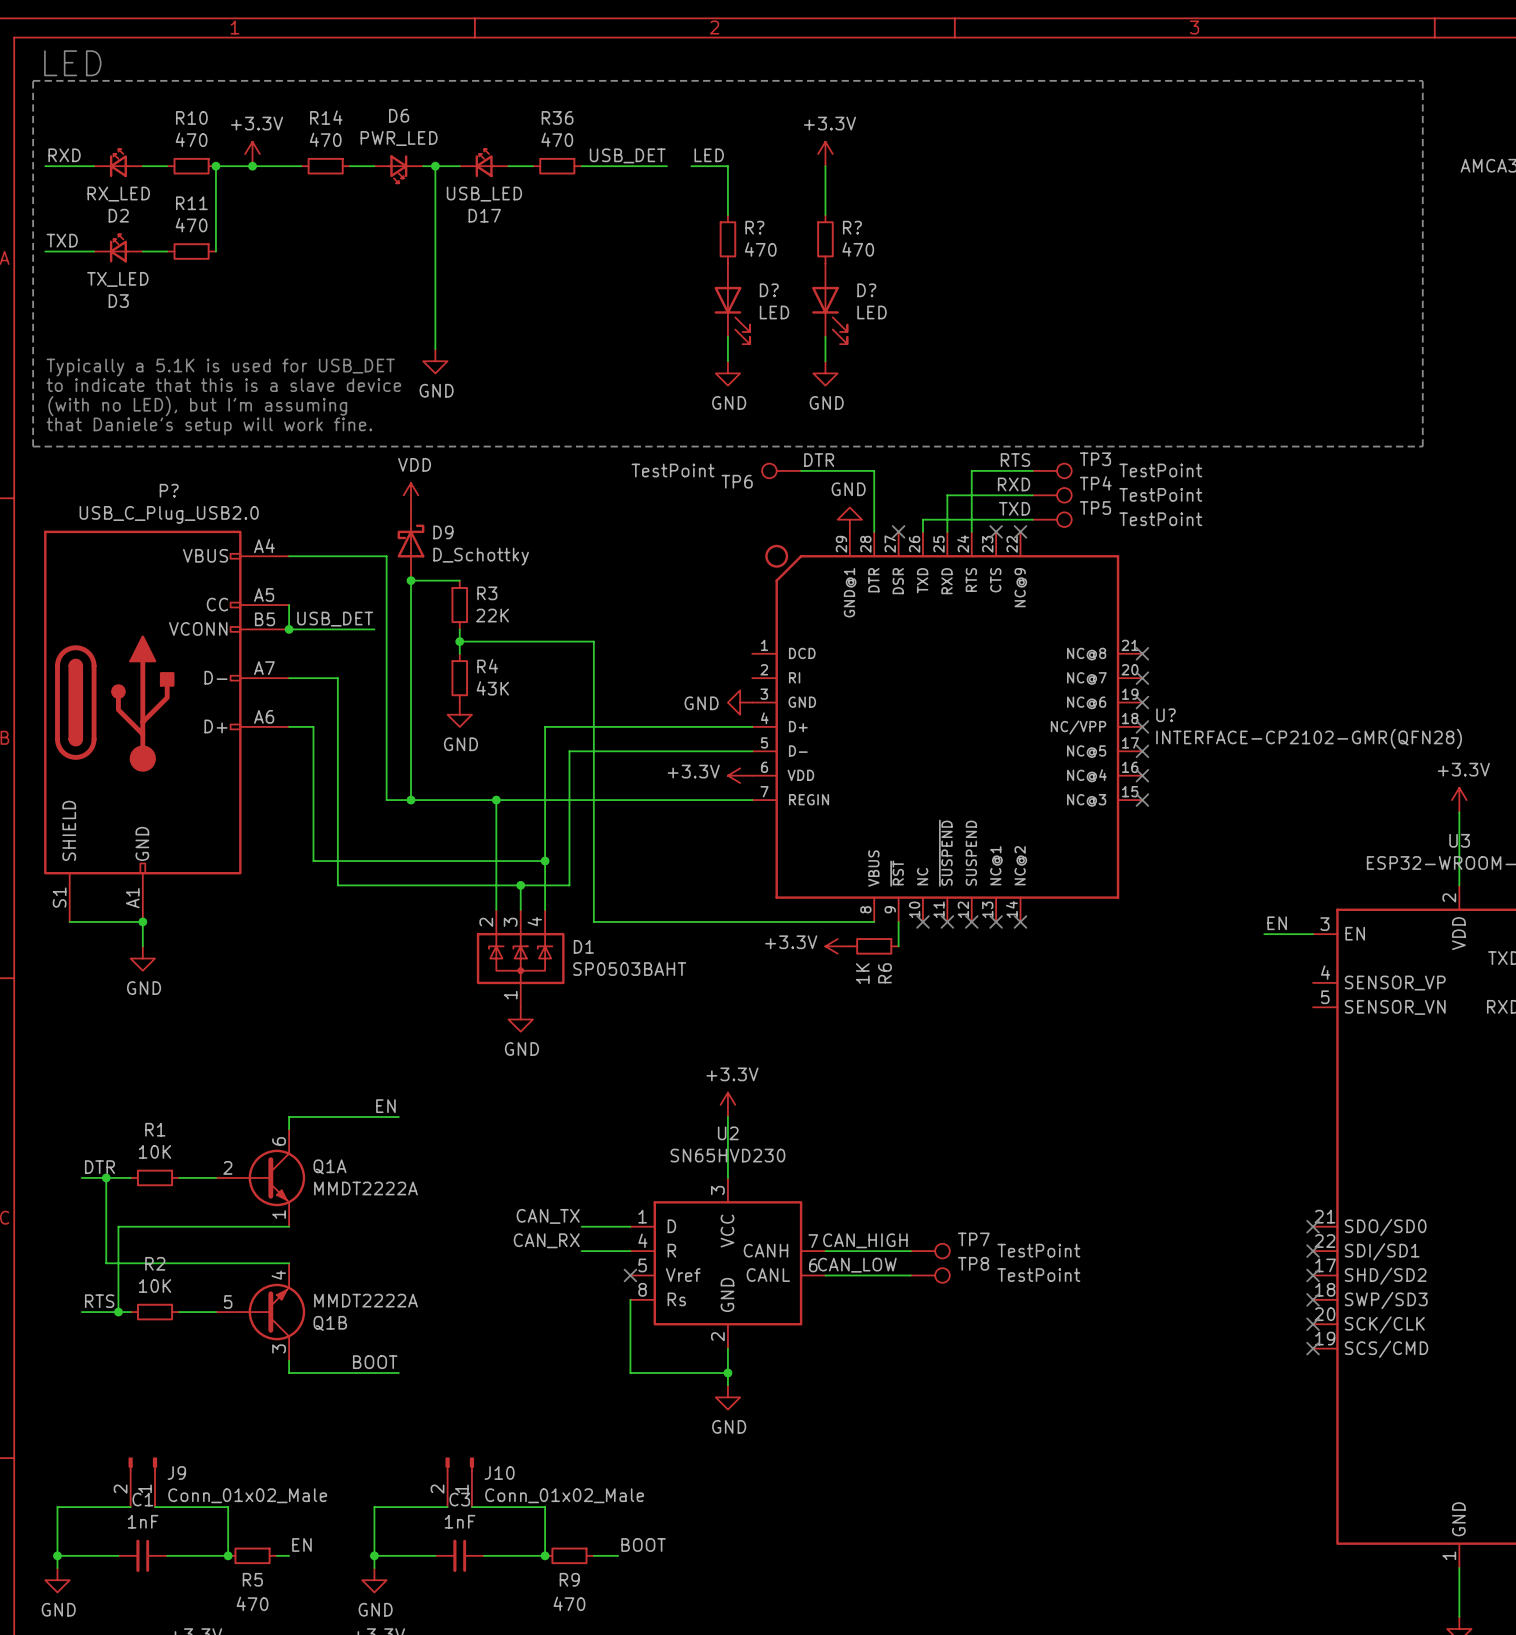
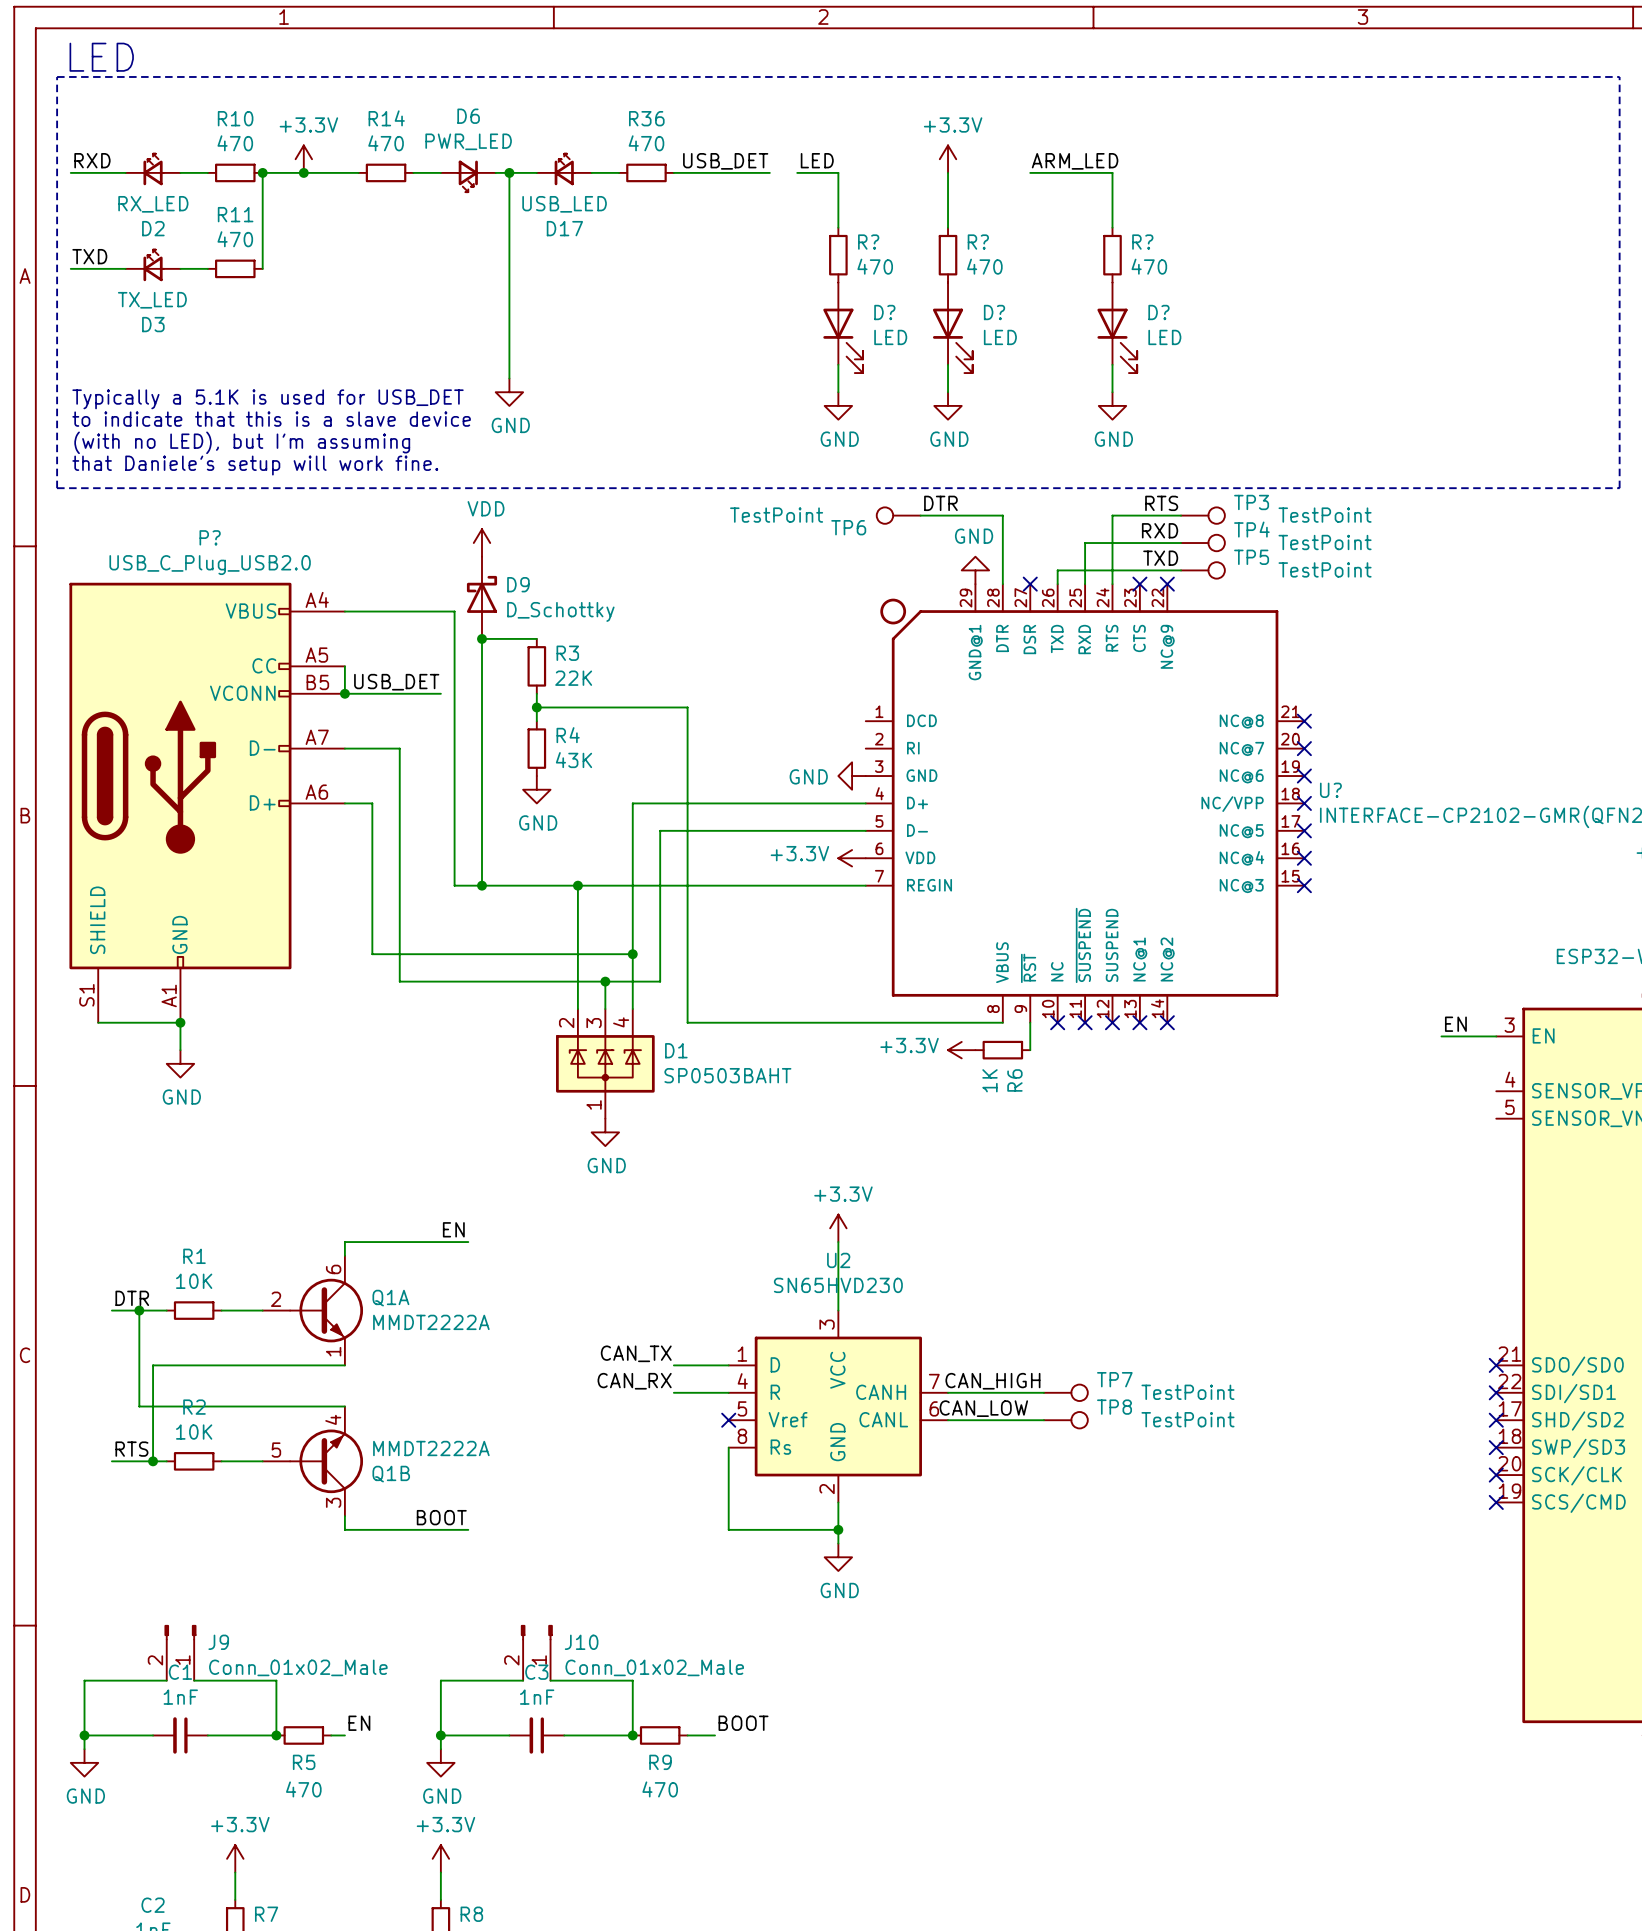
label: none -> ARM_LED (1075, 161)
wire: none -> (1030, 172) (1112, 172) (1112, 227)
R?: none -> 470 (1112, 255)
D?: none -> LED (1117, 327)
wire: none -> (1112, 364) (1112, 392)
power symbol: none -> GND (1112, 405)

